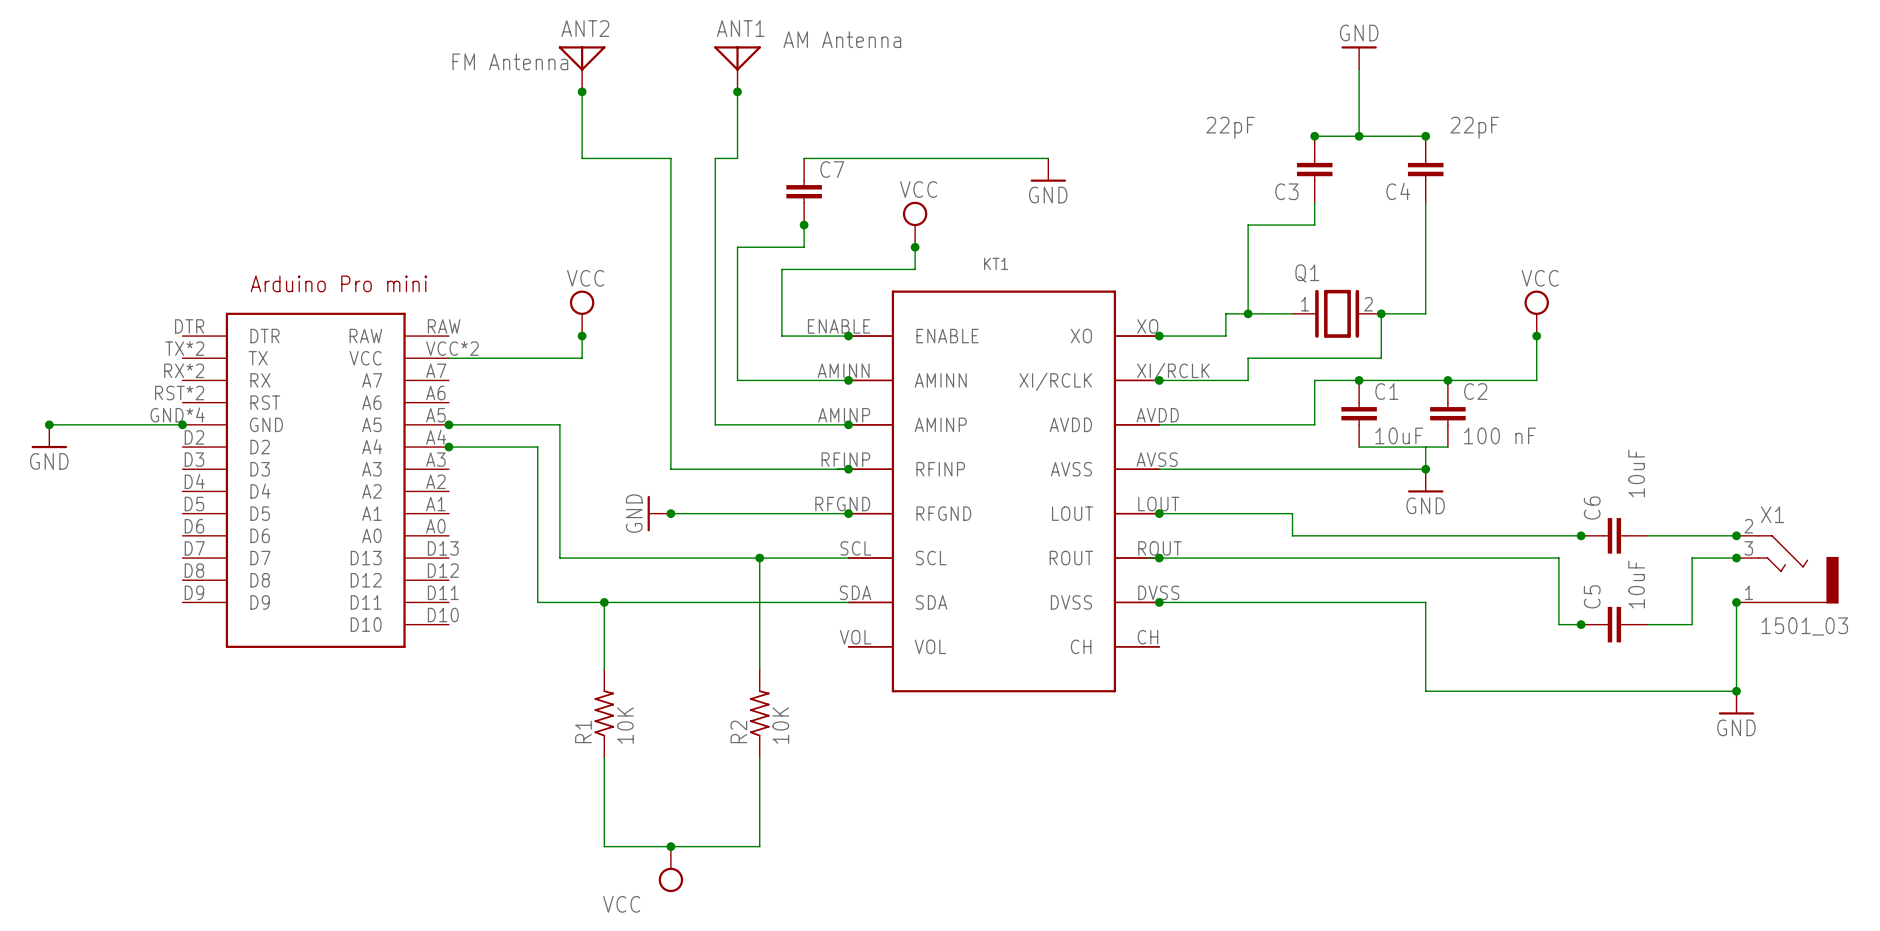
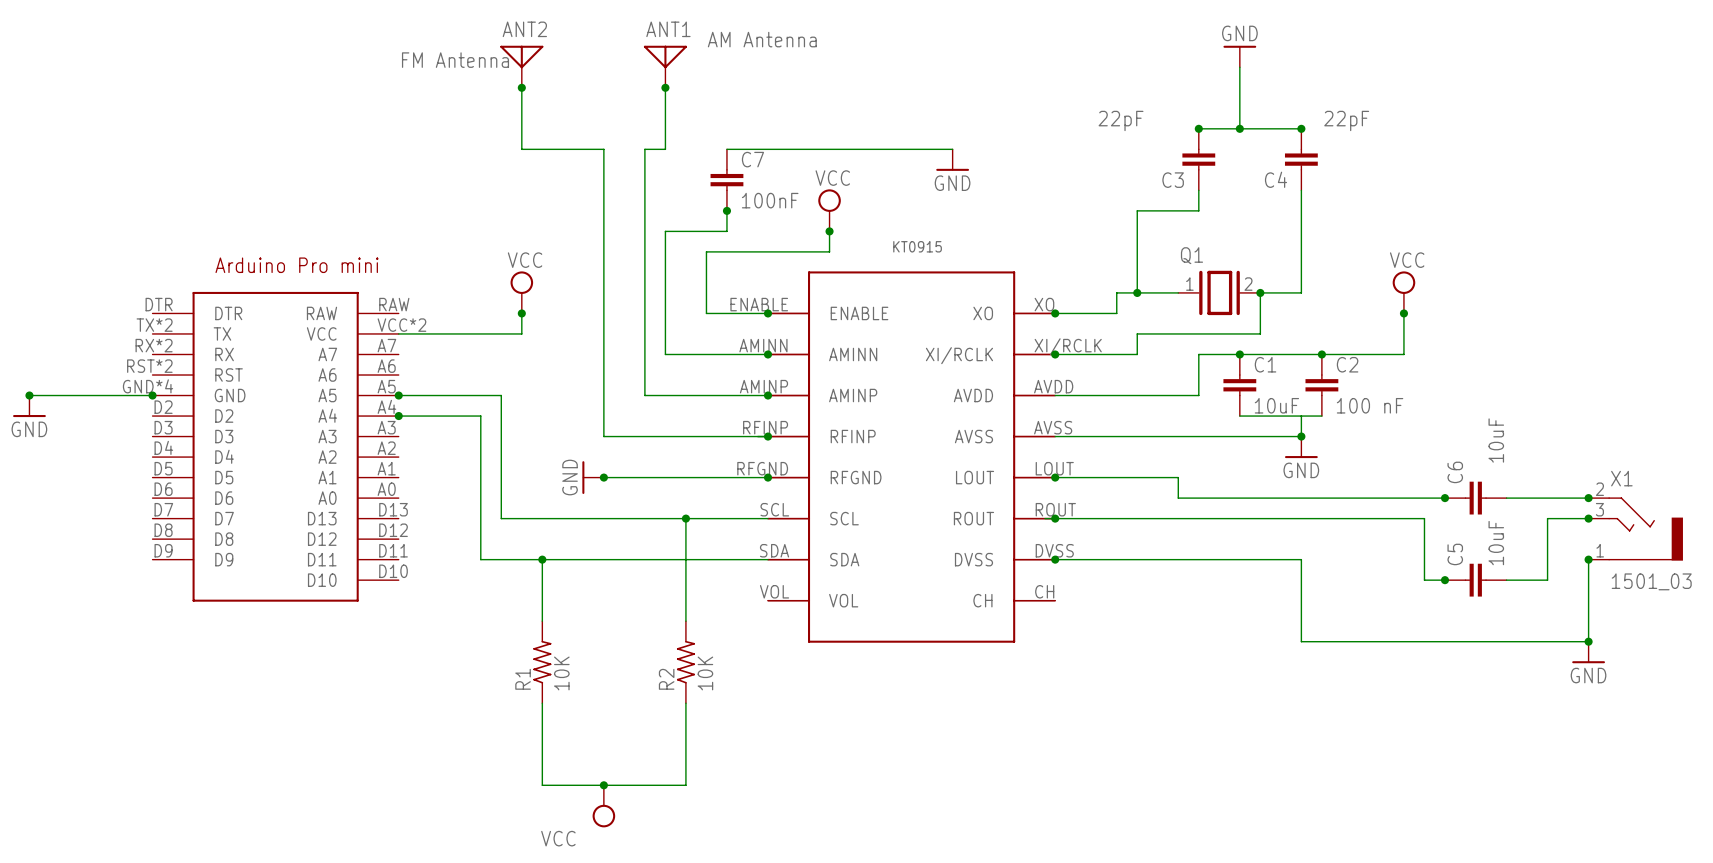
C7 value: none -> 100nF (770, 200)
KT1 name: KT1 (996, 263) -> KT0915 (917, 246)

